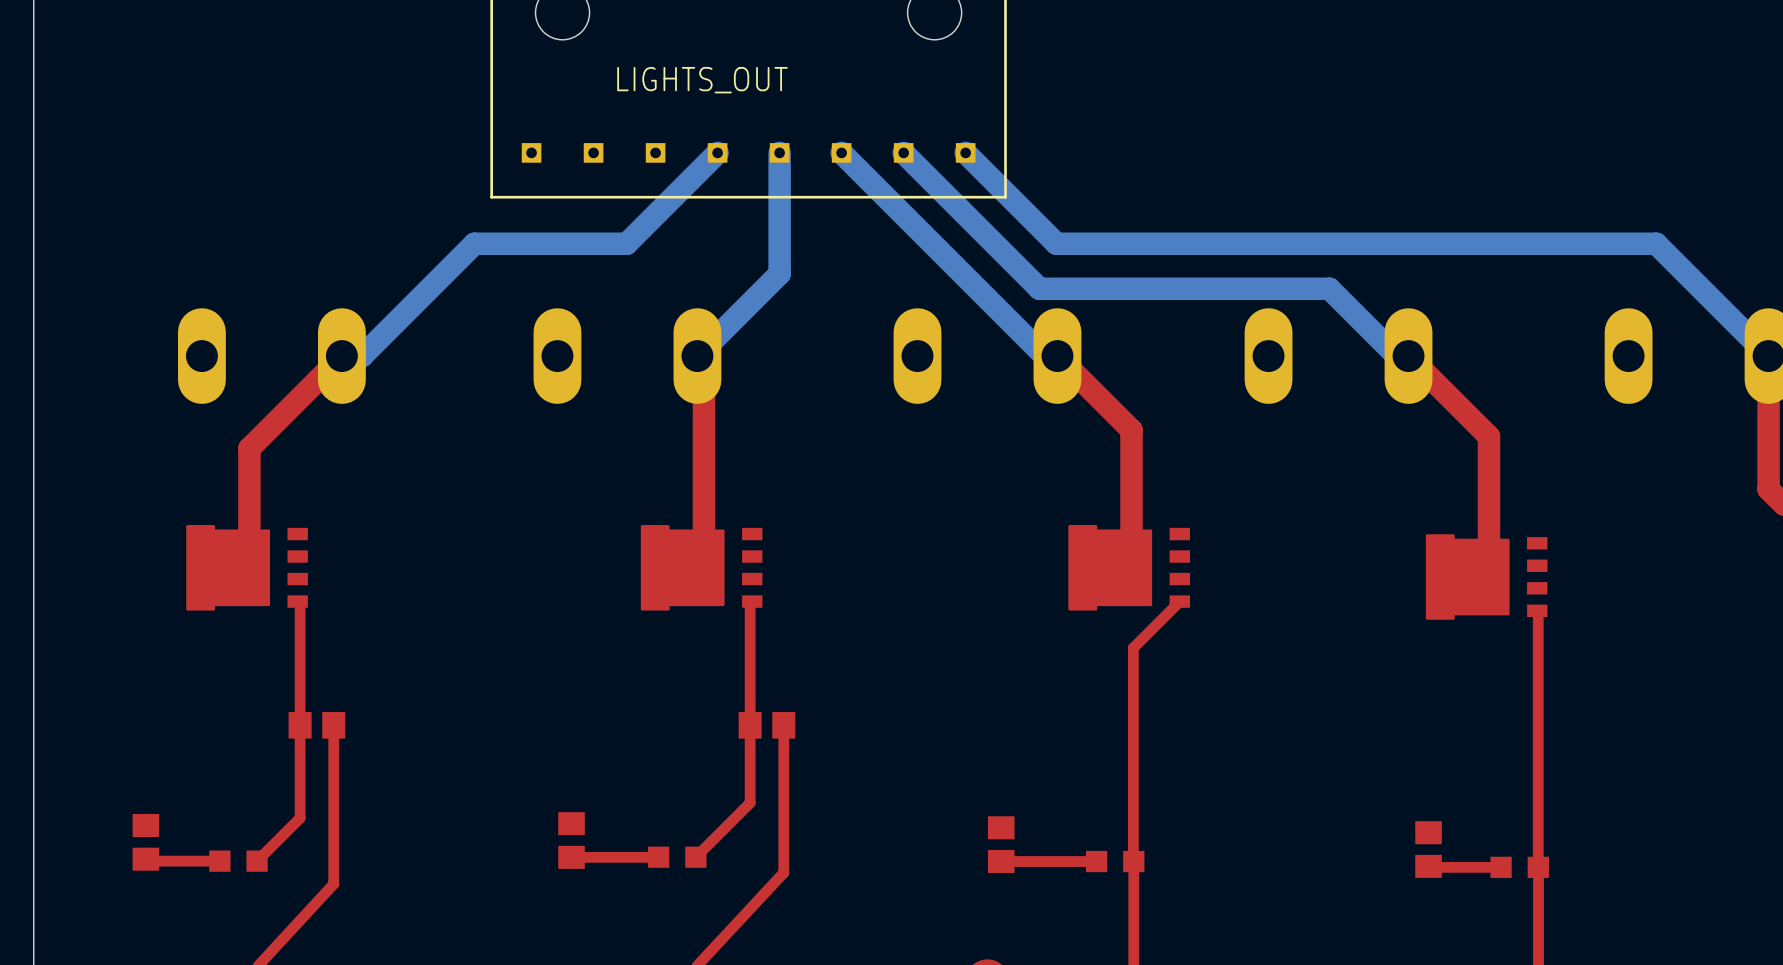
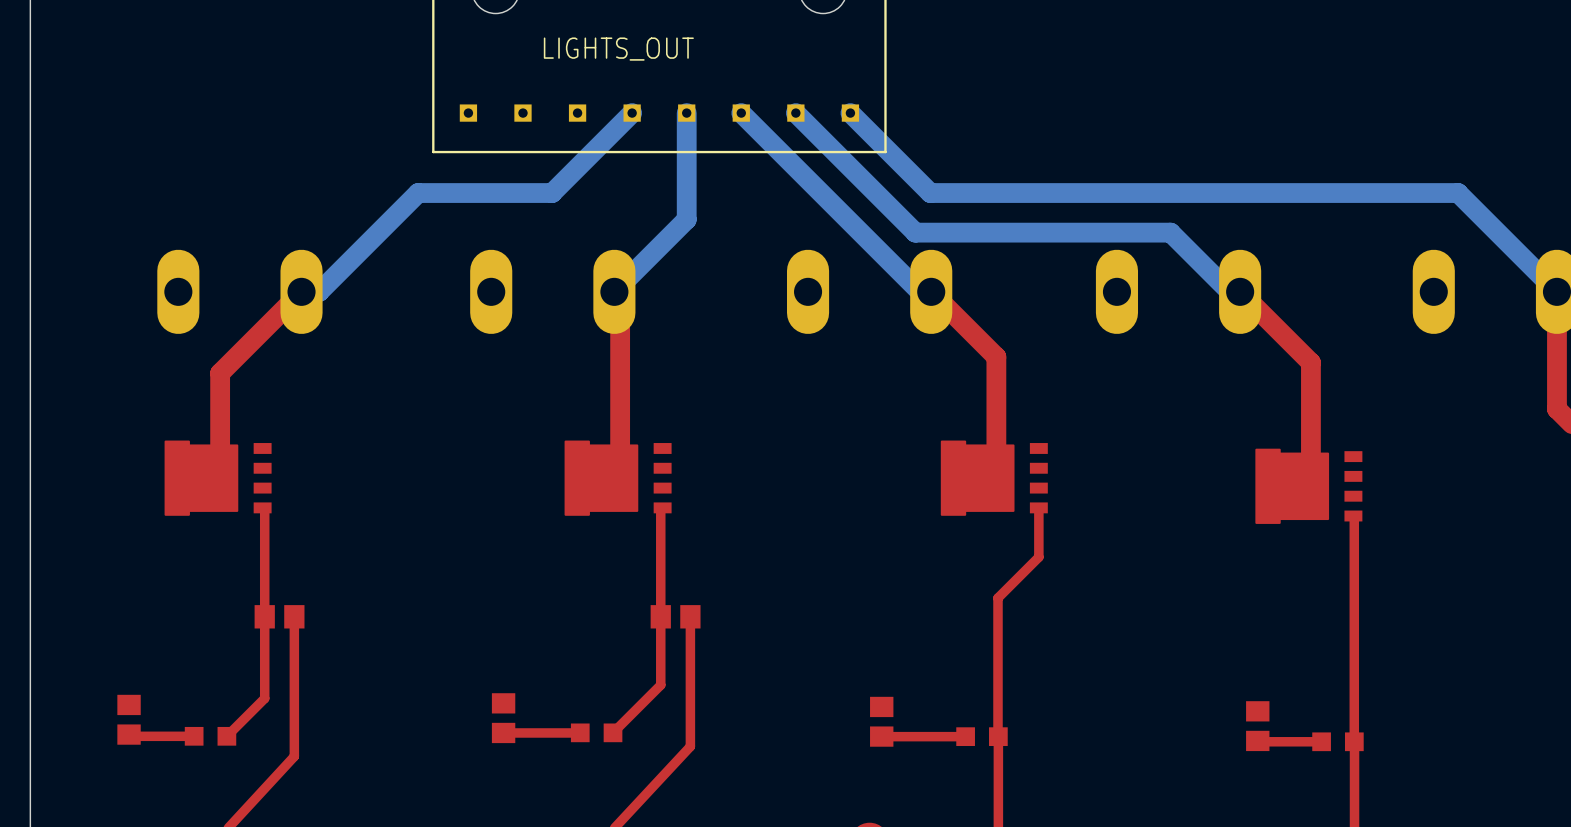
top track: (1179, 601) (1133, 648) (1133, 704) -> (1038, 507) (1038, 557) (997, 598)

